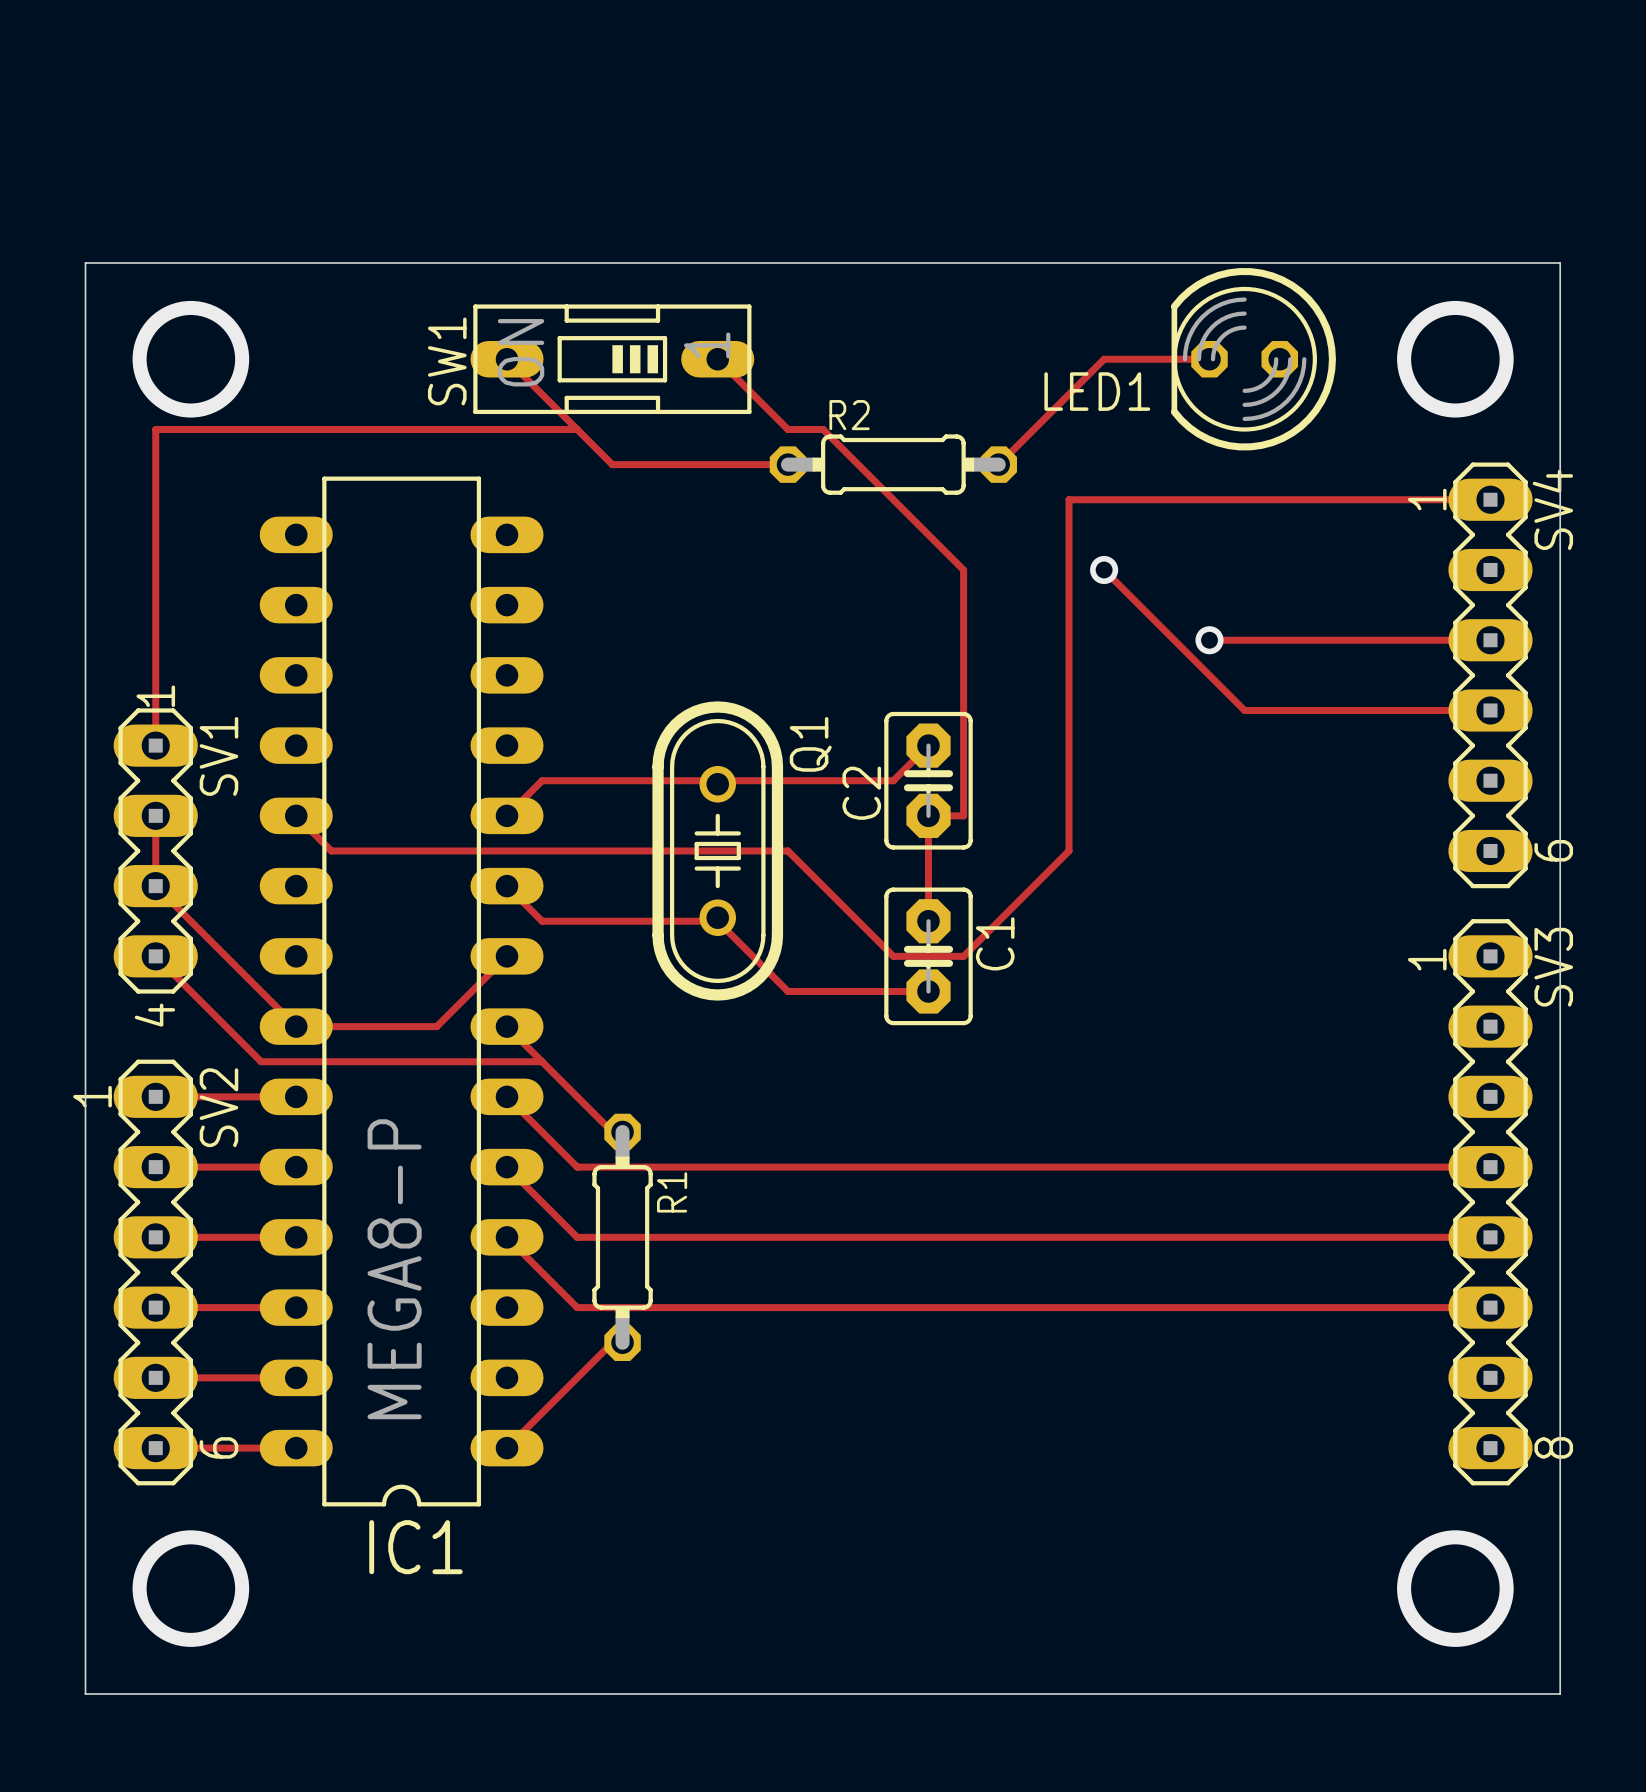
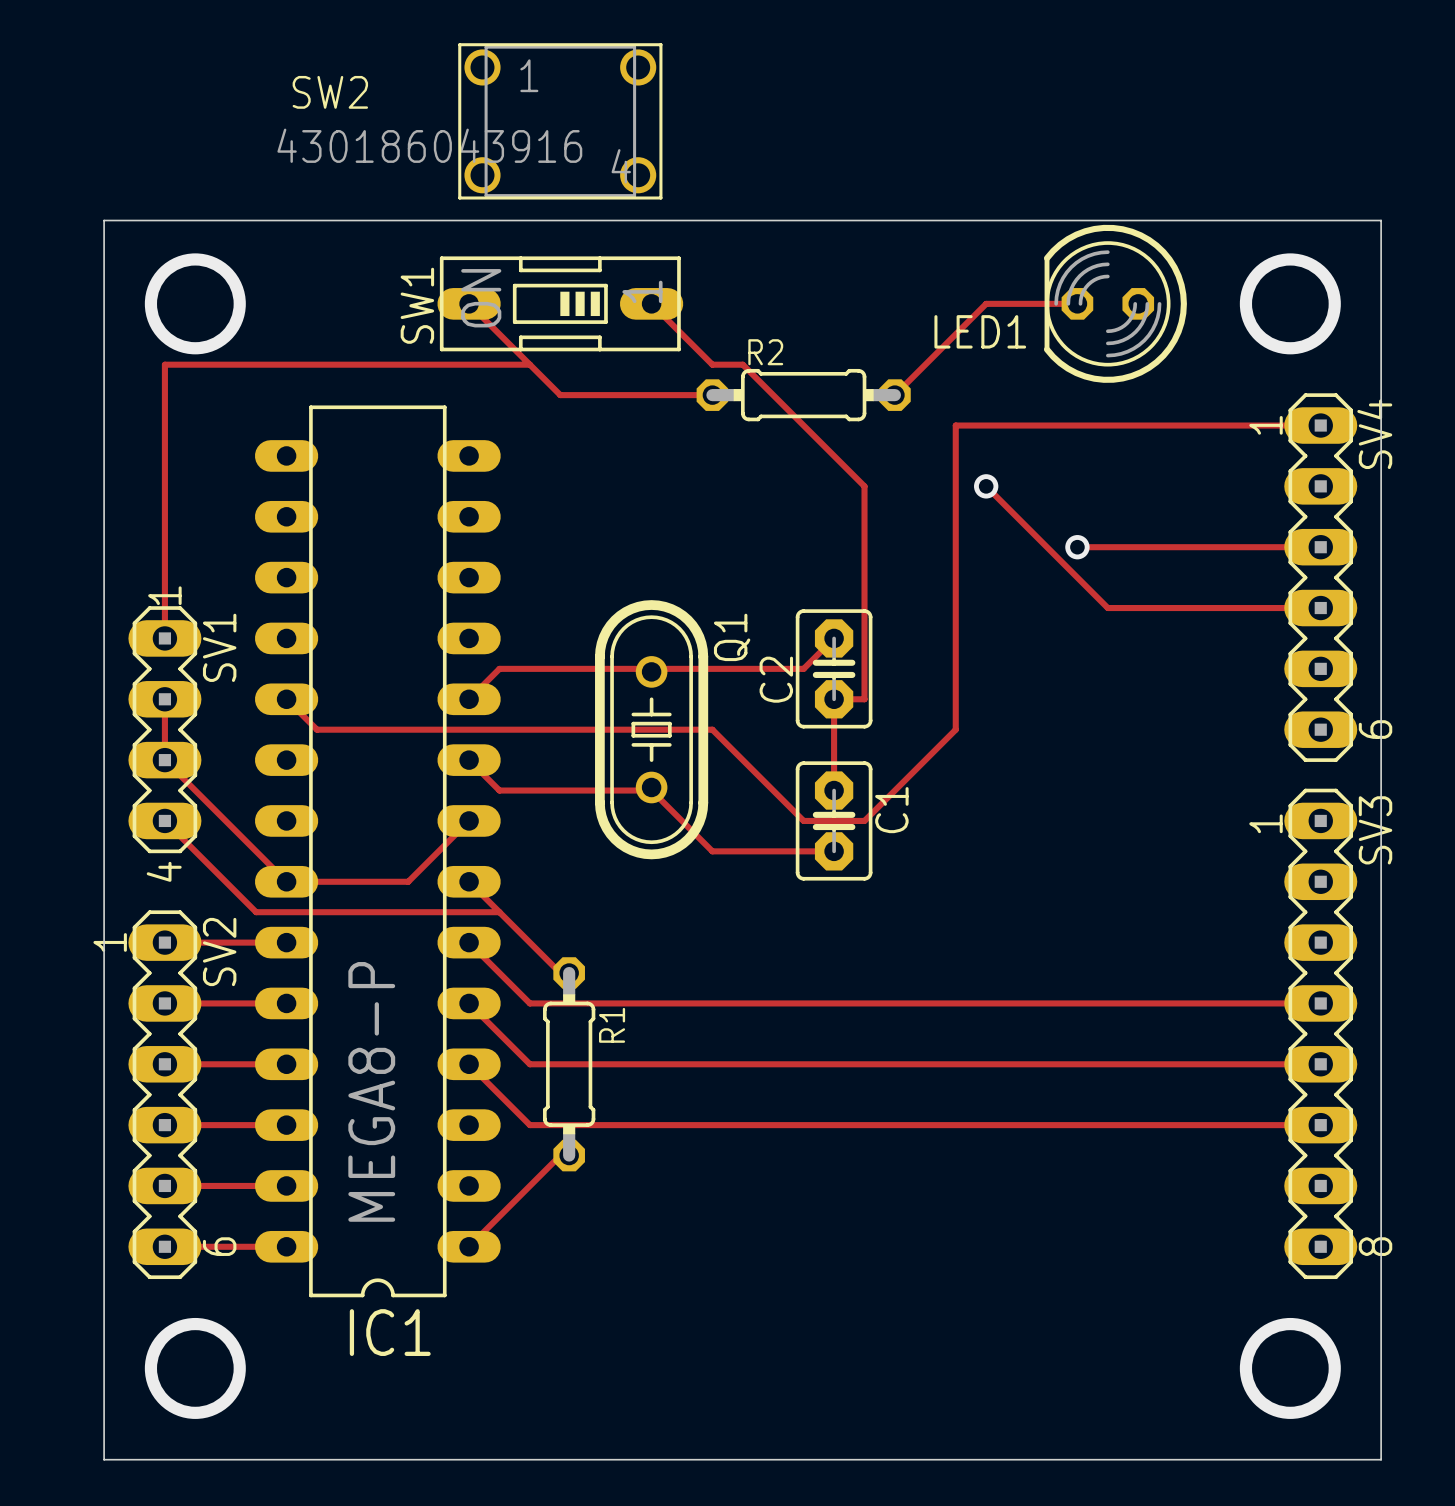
SW2: none -> 430186043916 (560, 121)

